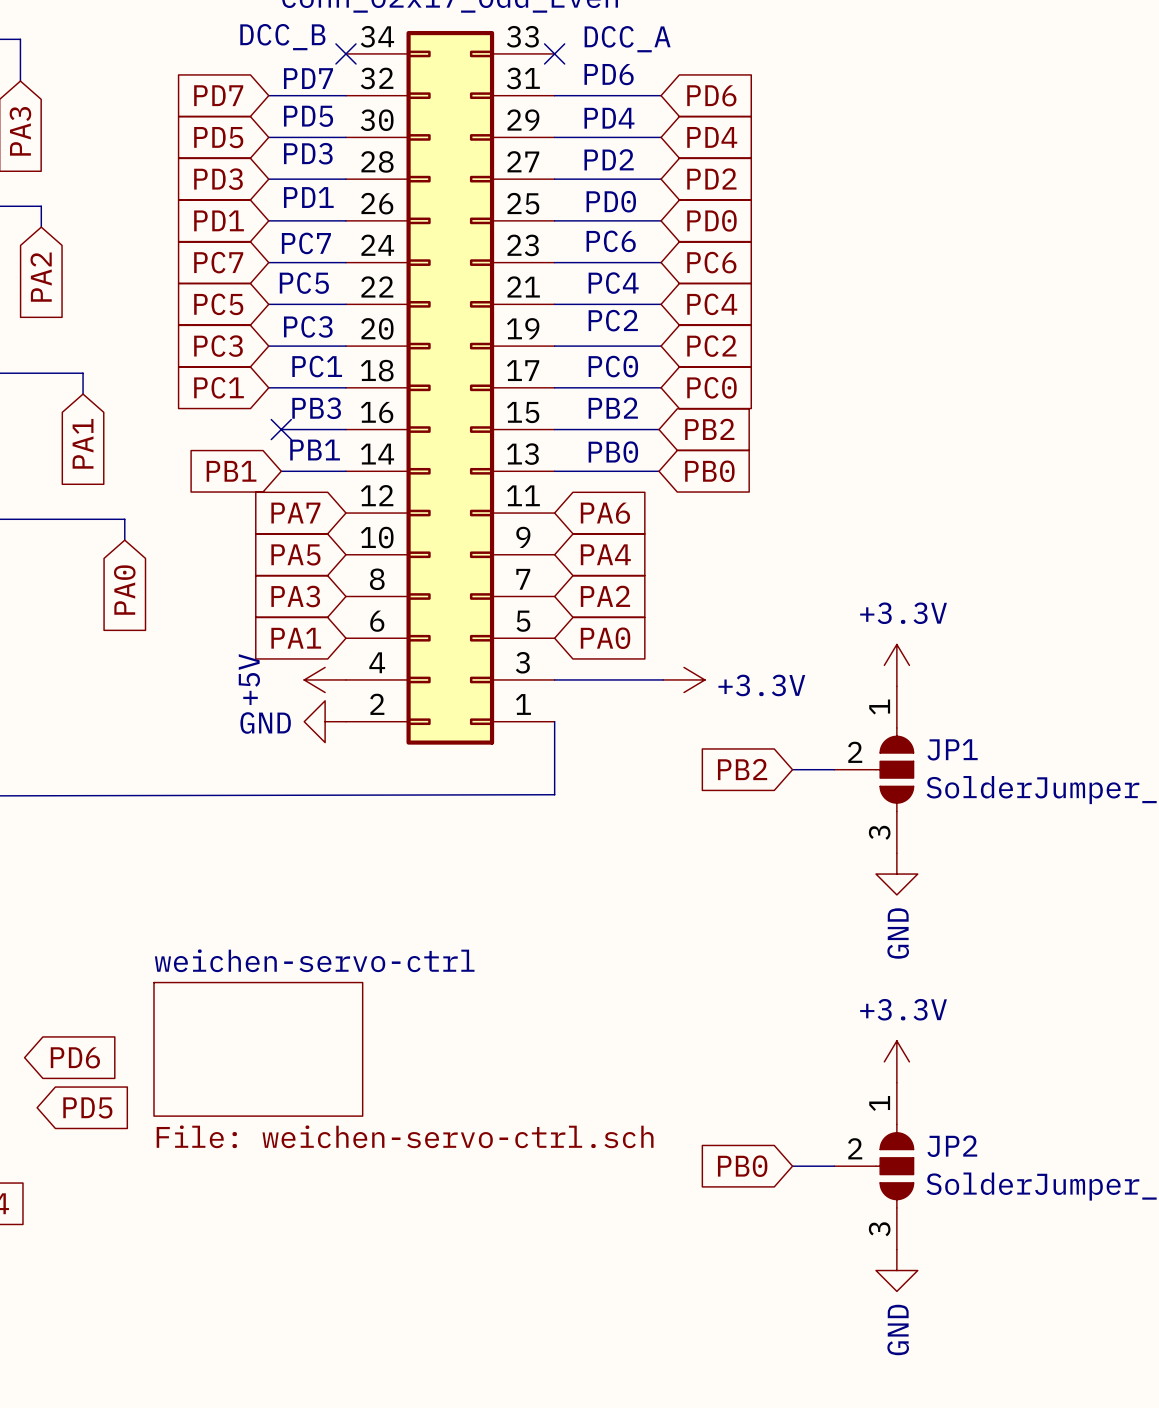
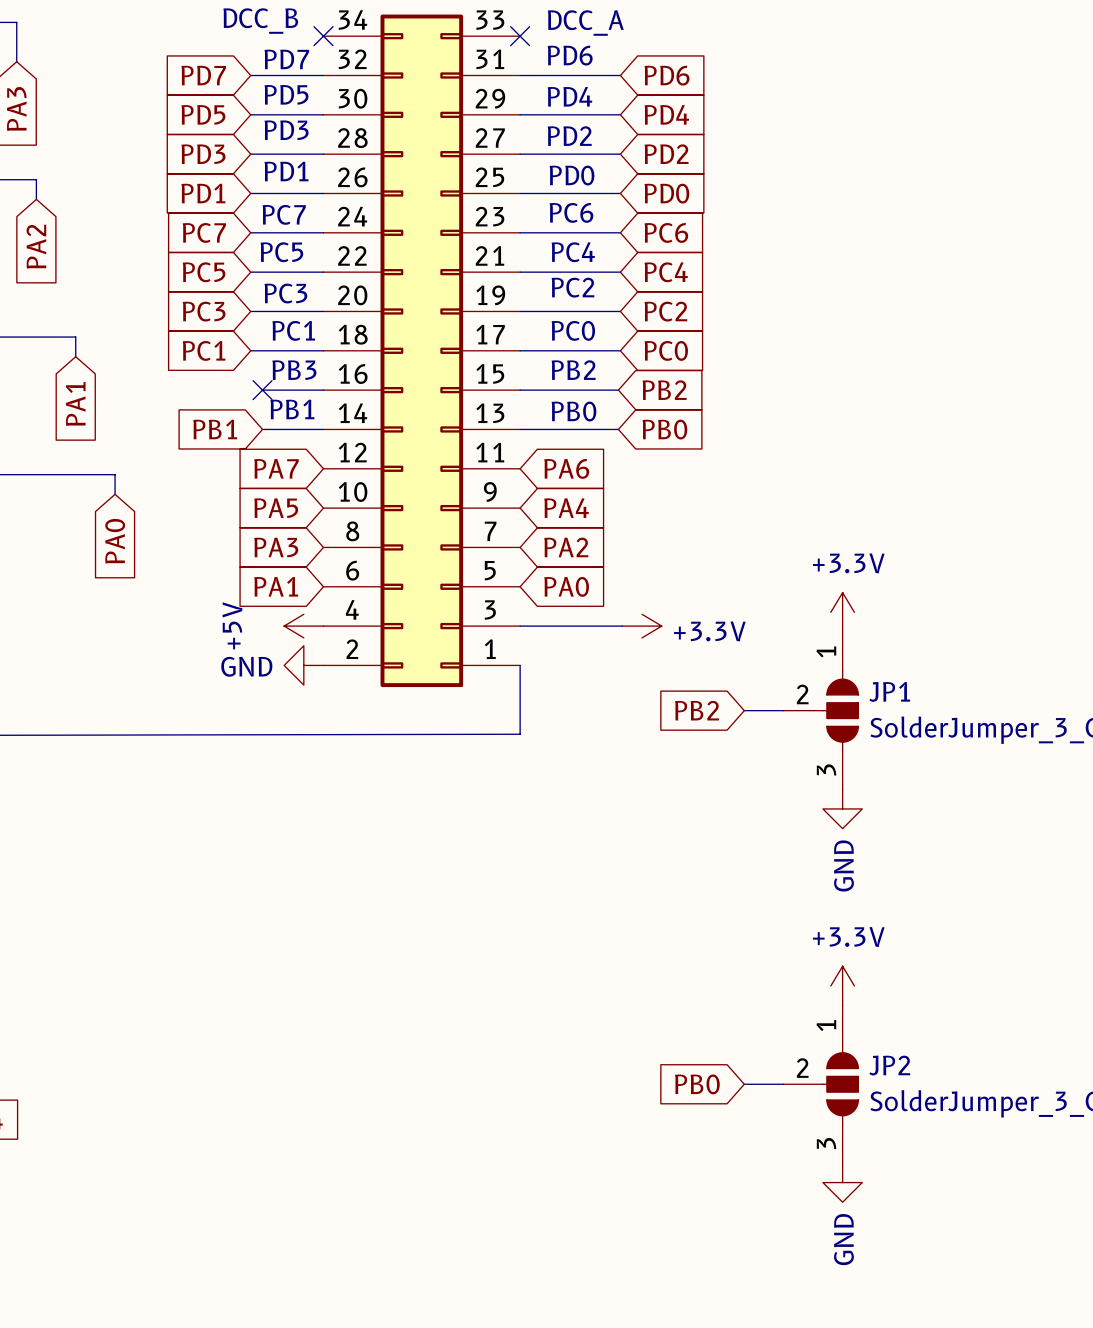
sheet weichen-servo-ctrl: File: weichen-servo-ctrl.sch (258, 1049) -> none
global label: PD6 (75, 1057) -> none
global label: PD5 (87, 1107) -> none

